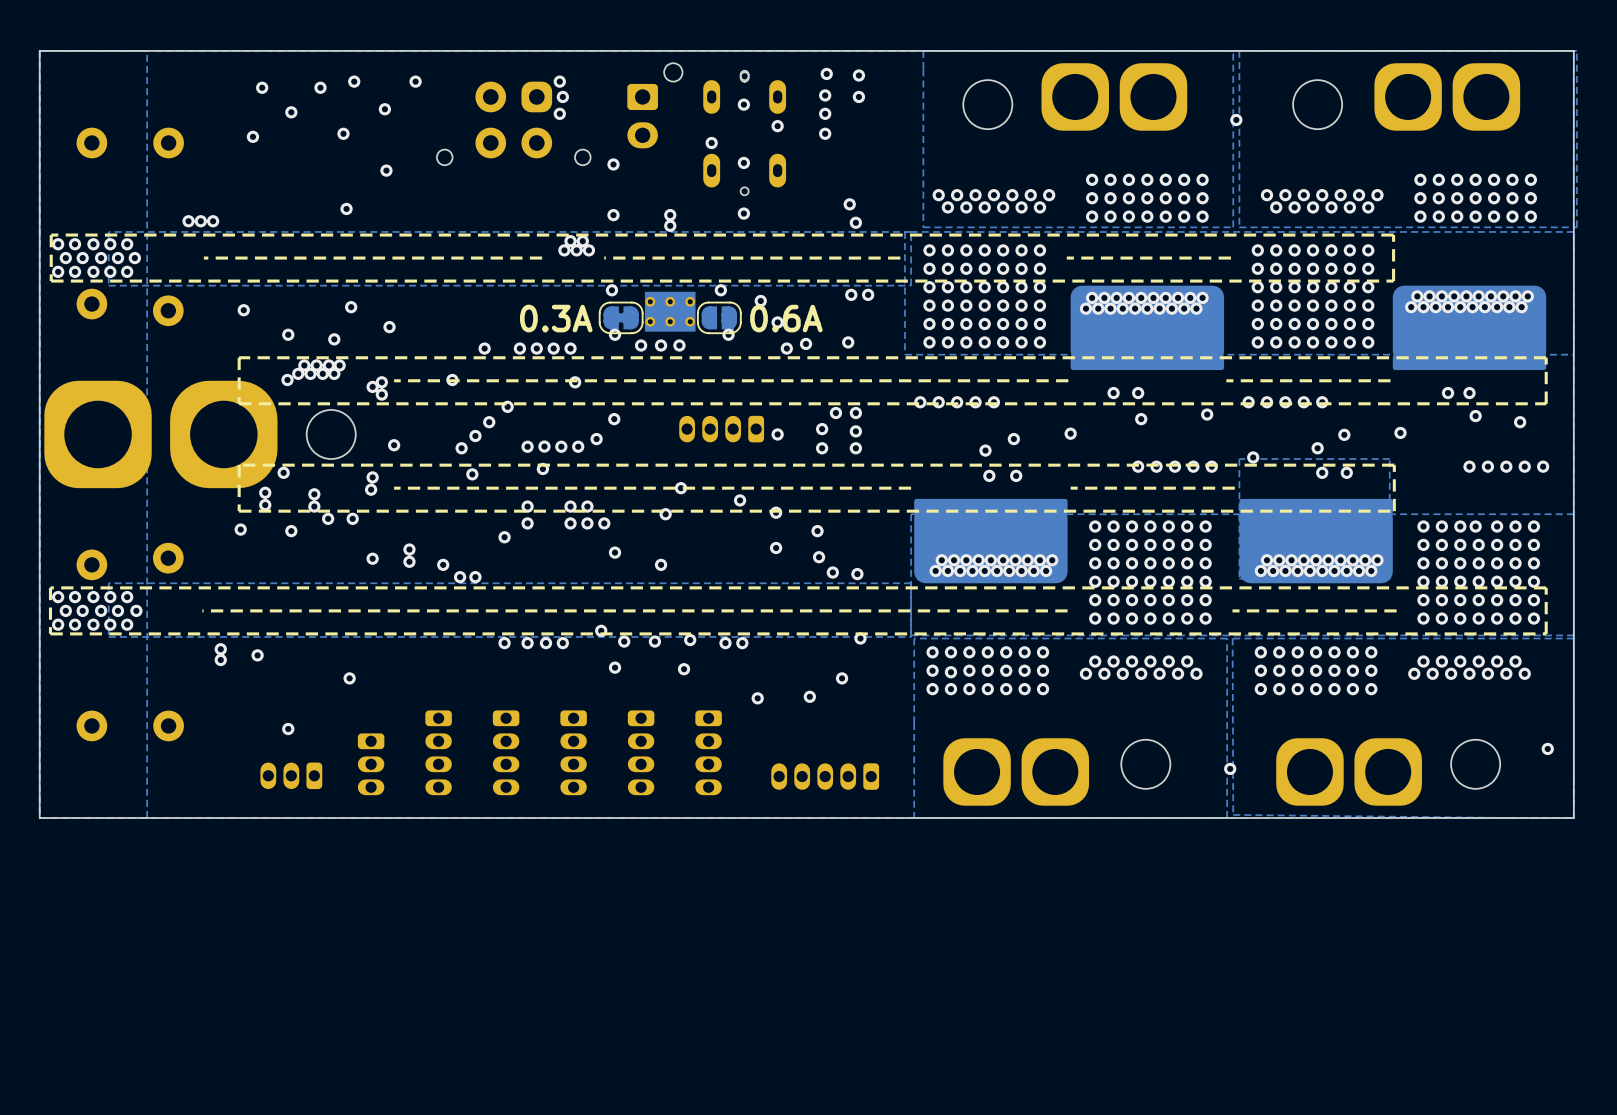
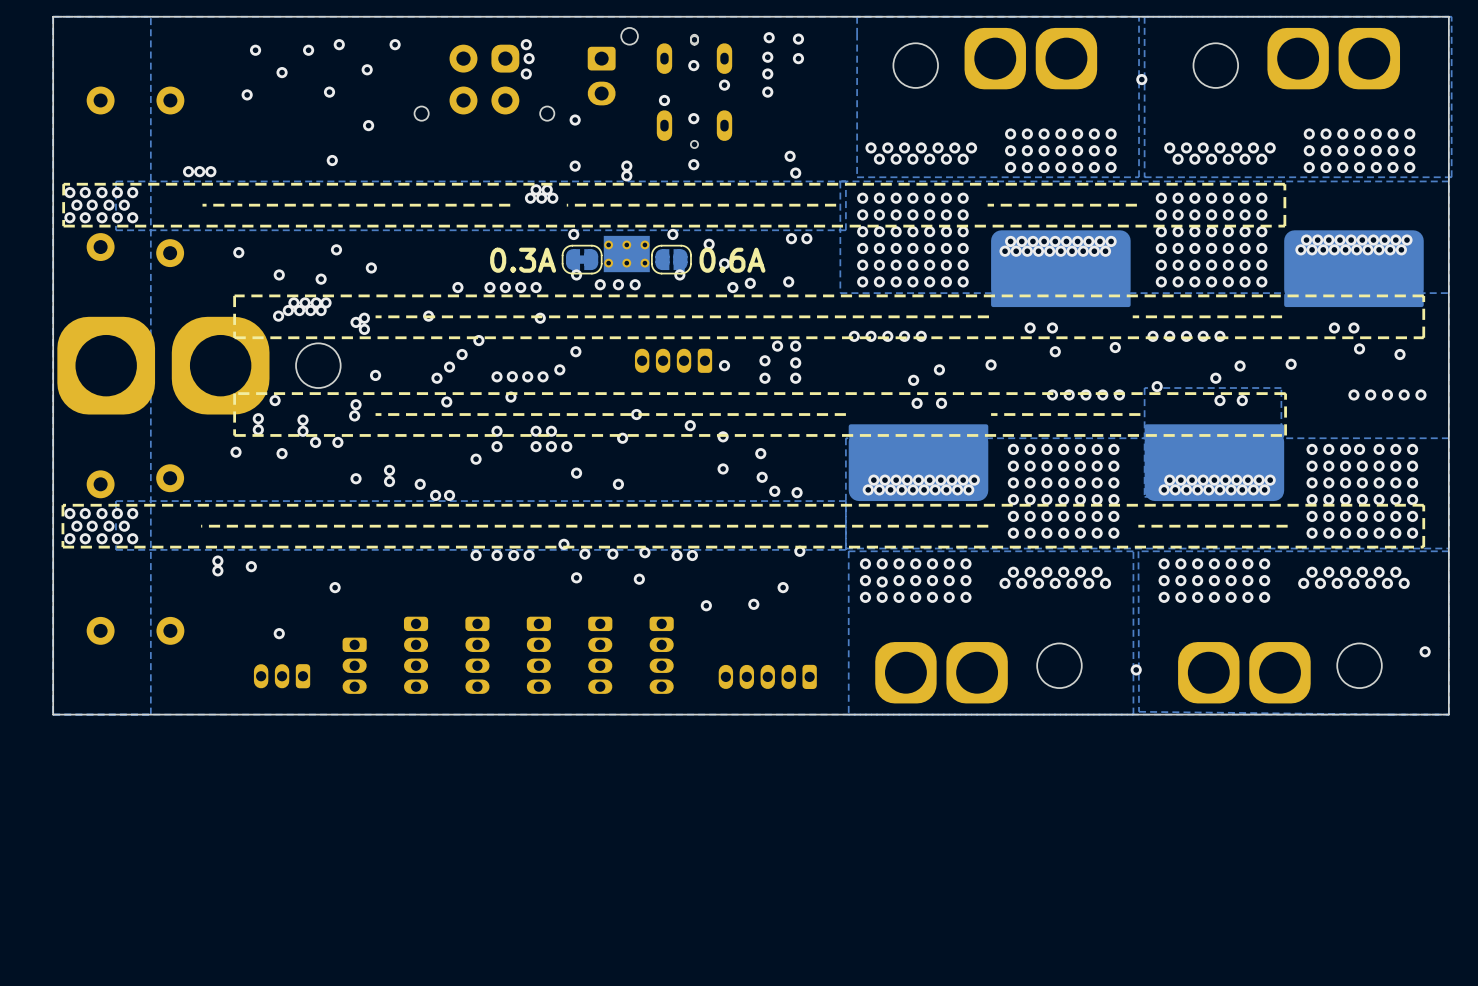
via: (134, 258) -> none
via: (136, 610) -> none

